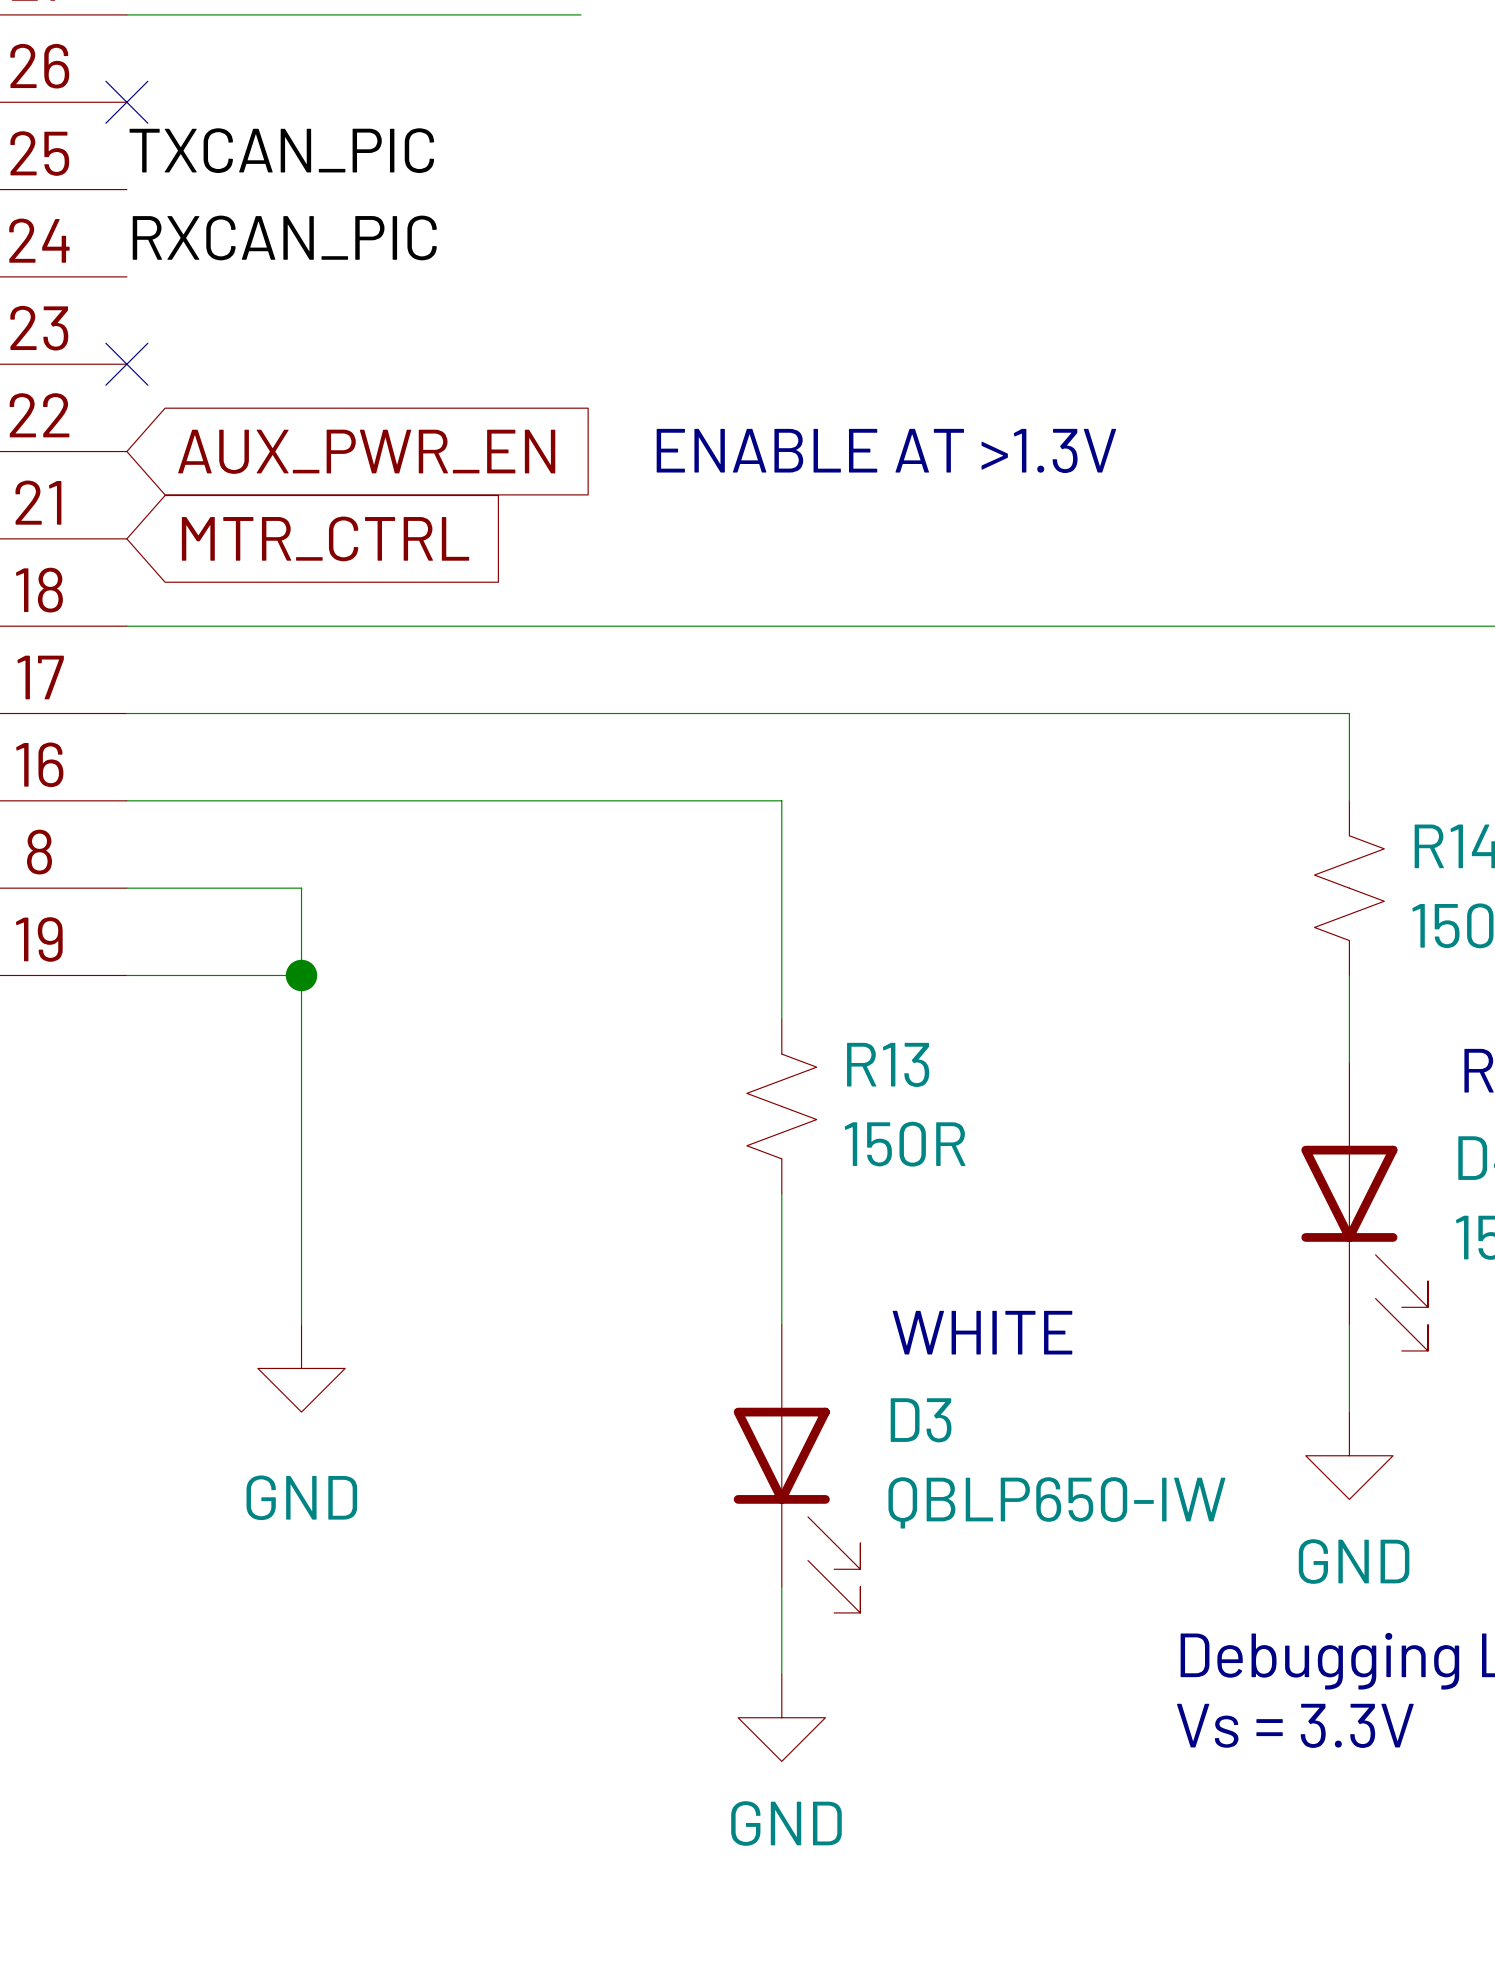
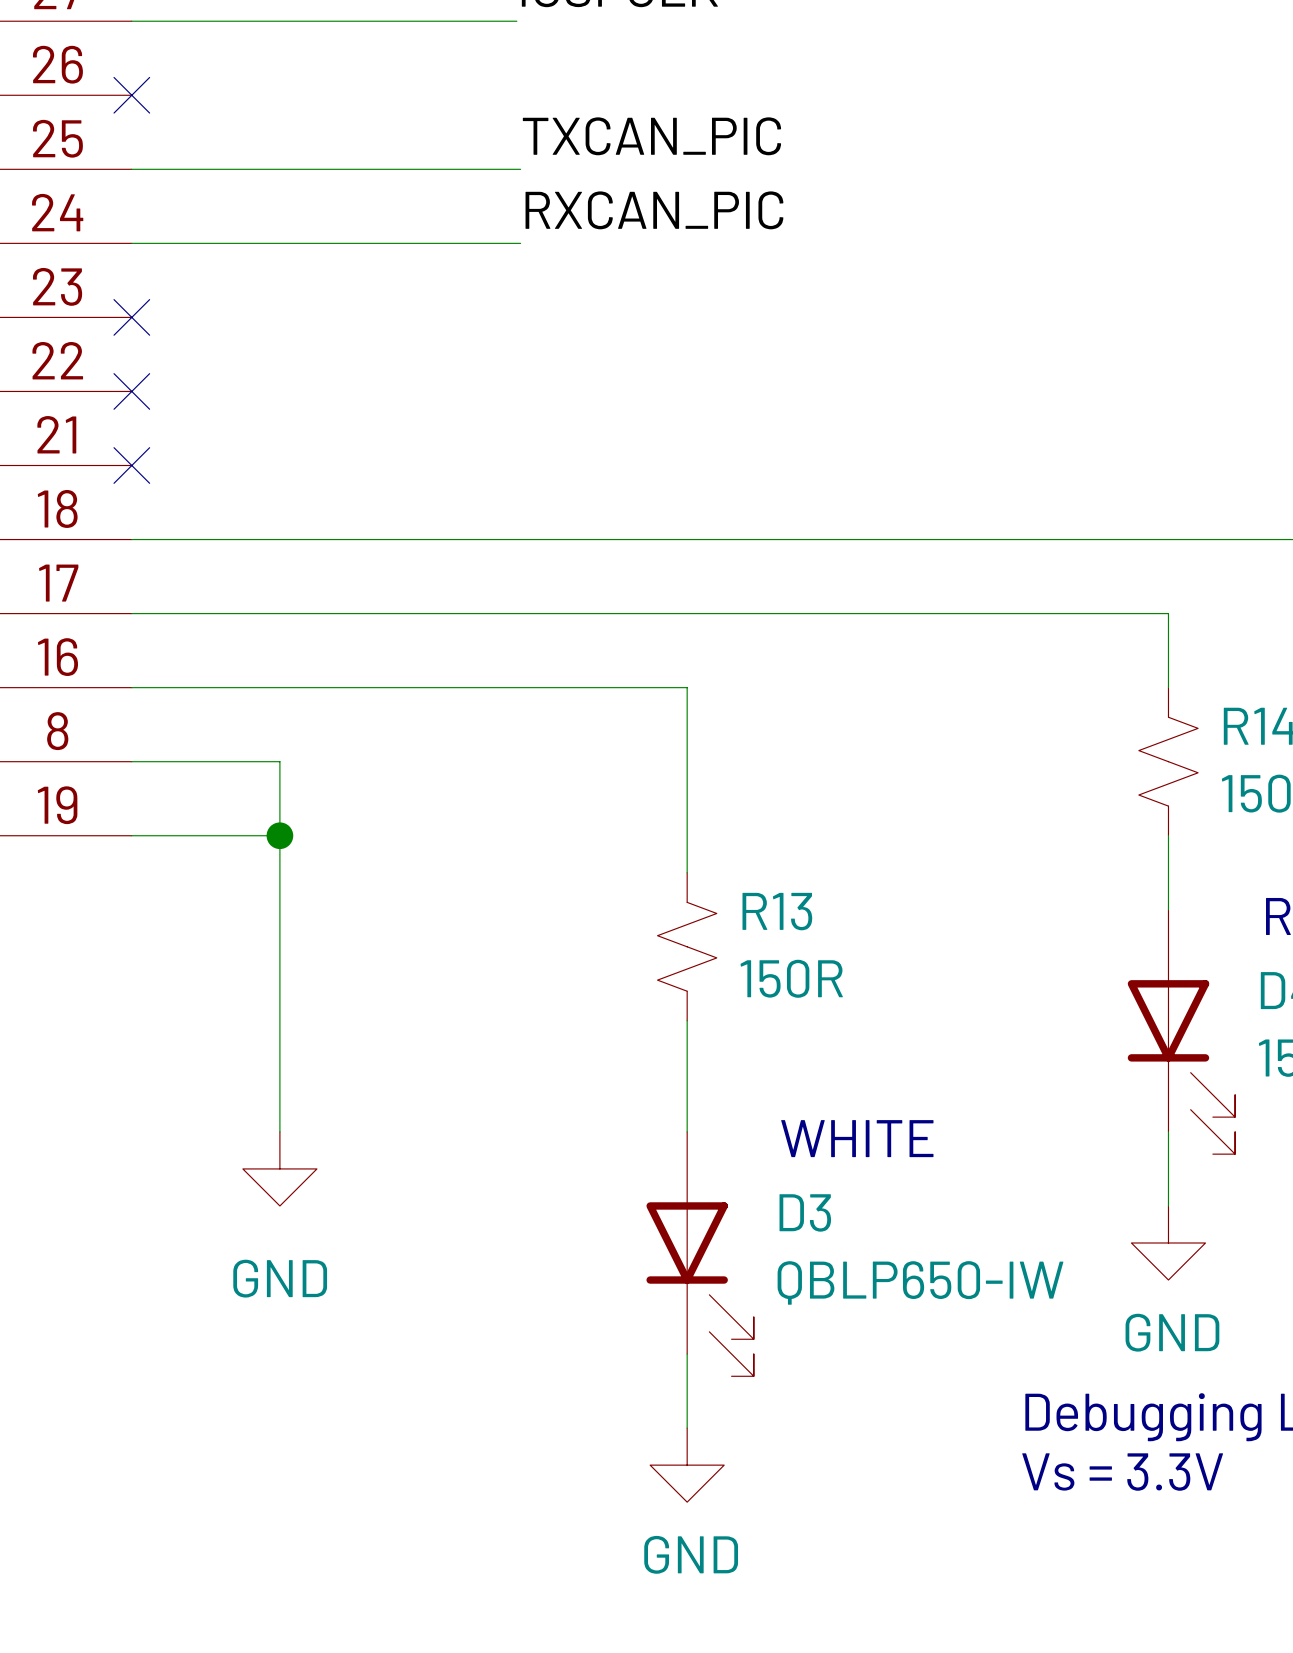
label position: TXCAN_PIC (281, 150) -> TXCAN_PIC (651, 136)
wire: none -> (131, 169) (520, 169)
label position: RXCAN_PIC (284, 237) -> RXCAN_PIC (654, 210)
wire: none -> (131, 243) (520, 243)
text: ENABLE AT >1.3V (886, 450) -> none
no-connect mark: none -> (131, 391)
global label: AUX_PWR_EN (366, 451) -> none
no-connect mark: none -> (131, 465)
global label: MTR_CTRL (325, 538) -> none

